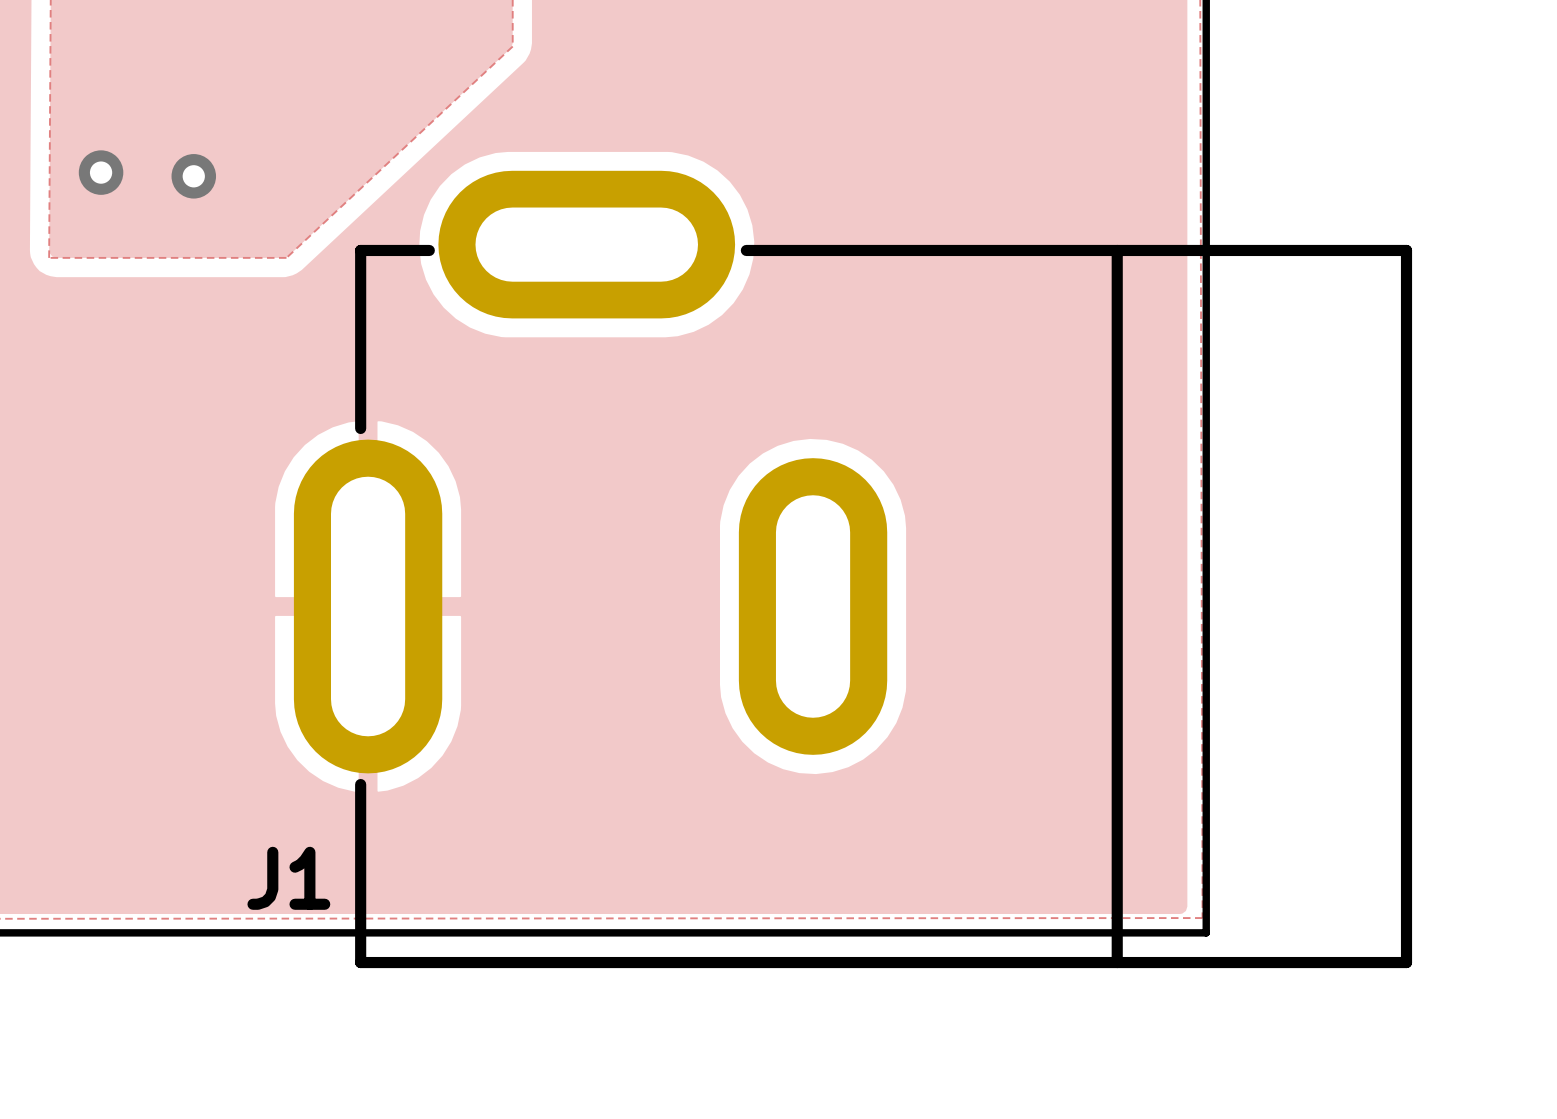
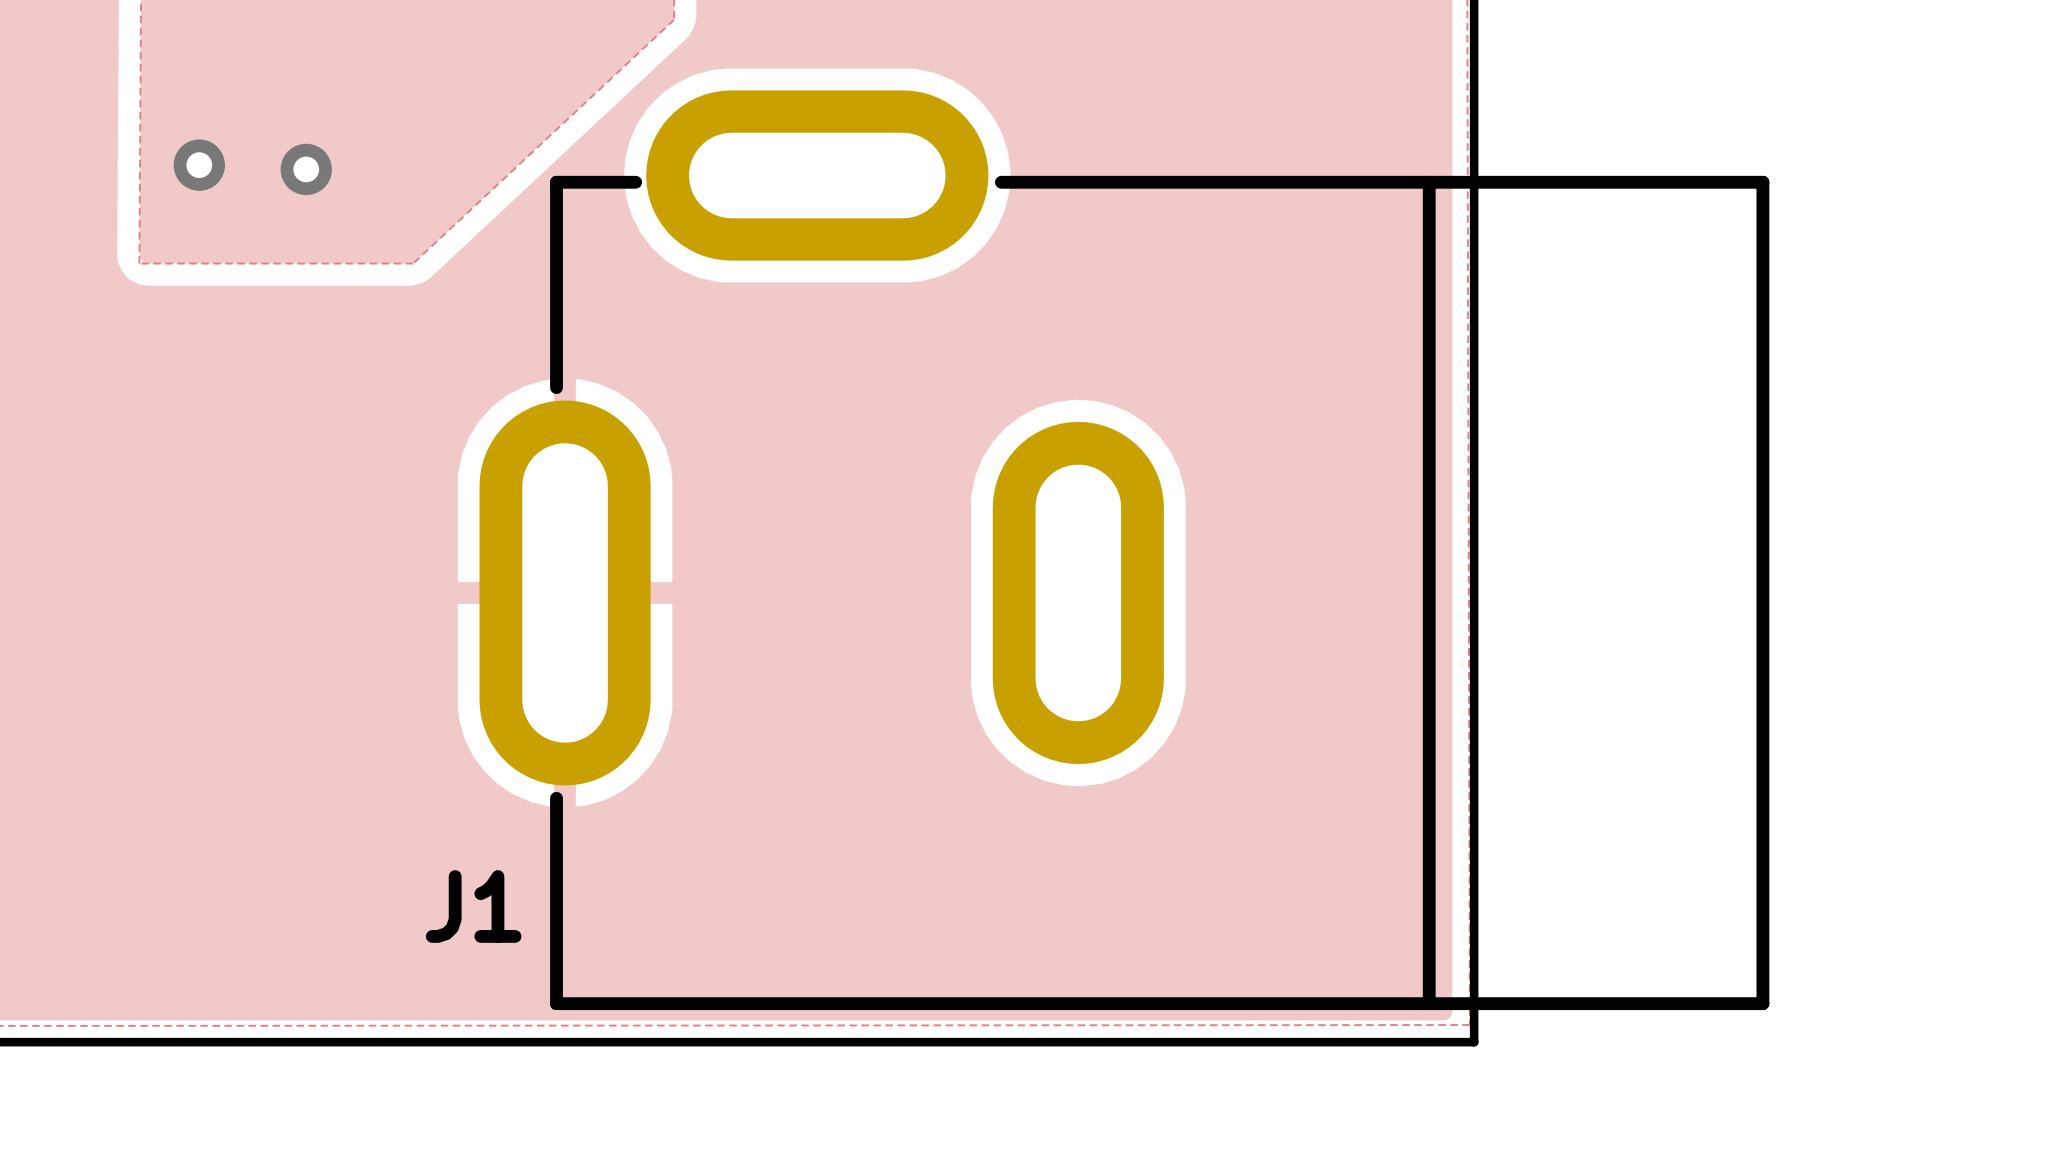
J1 position: (852, 569) -> (1124, 550)

